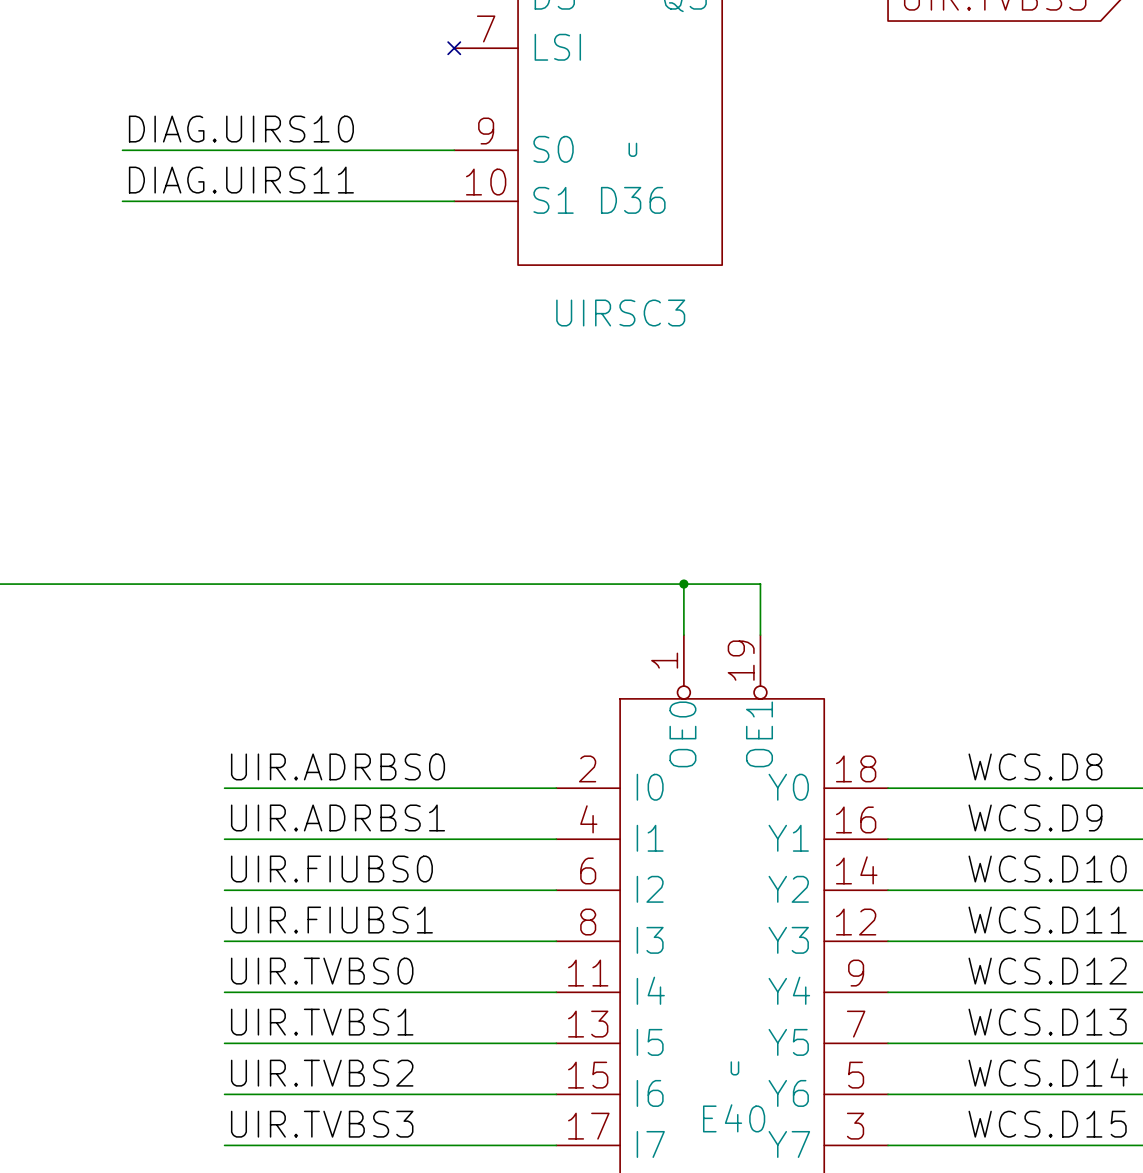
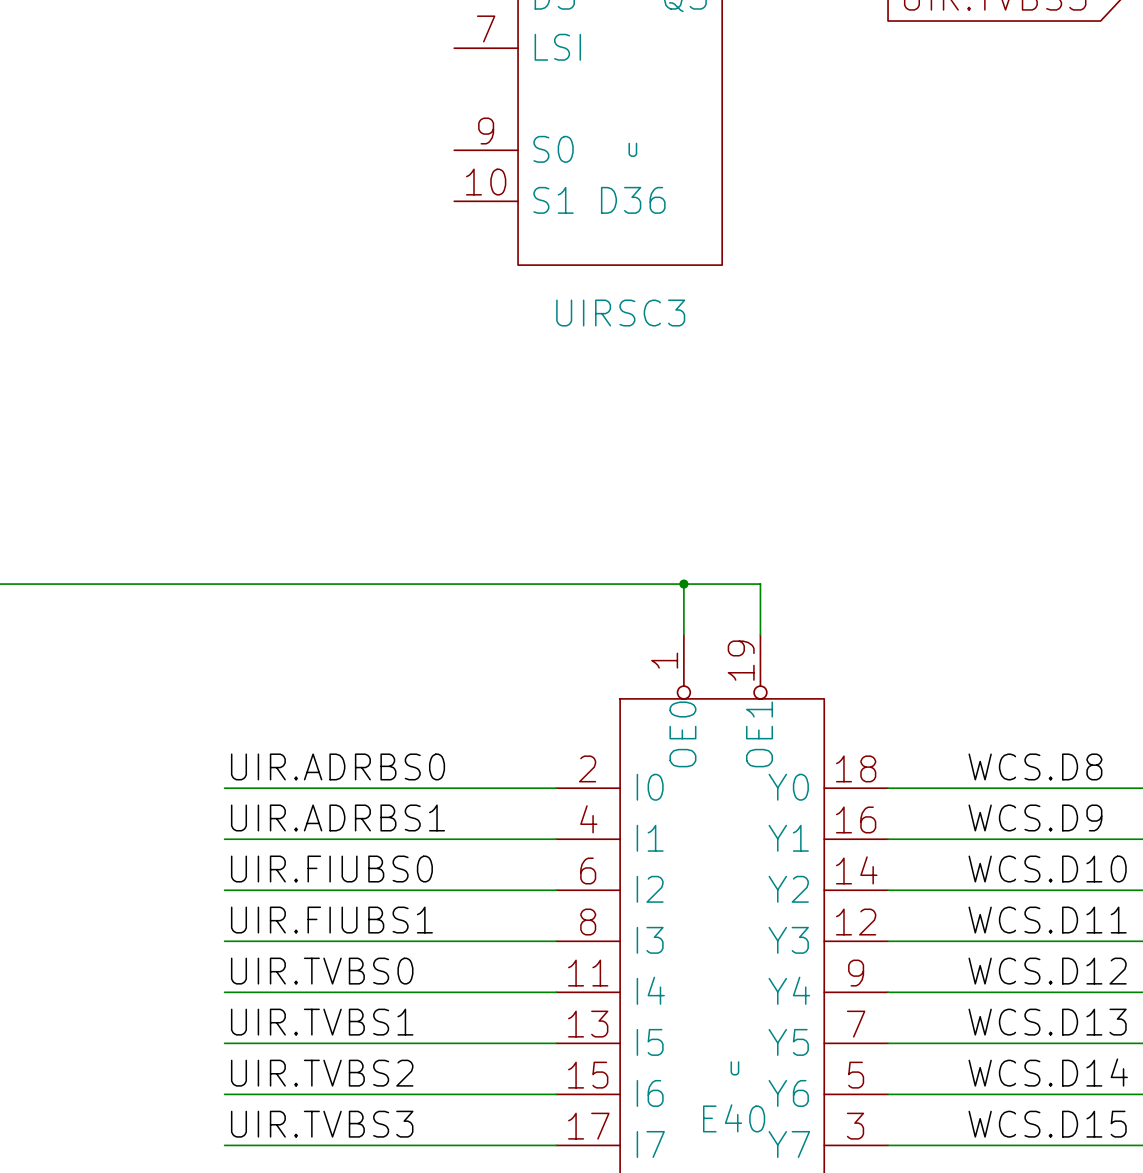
no-connect mark: (454, 48) -> none
label: DIAG.UIRS10 (241, 129) -> none
wire: (122, 150) (454, 150) -> none
label: DIAG.UIRS11 (241, 180) -> none
wire: (122, 201) (454, 201) -> none

